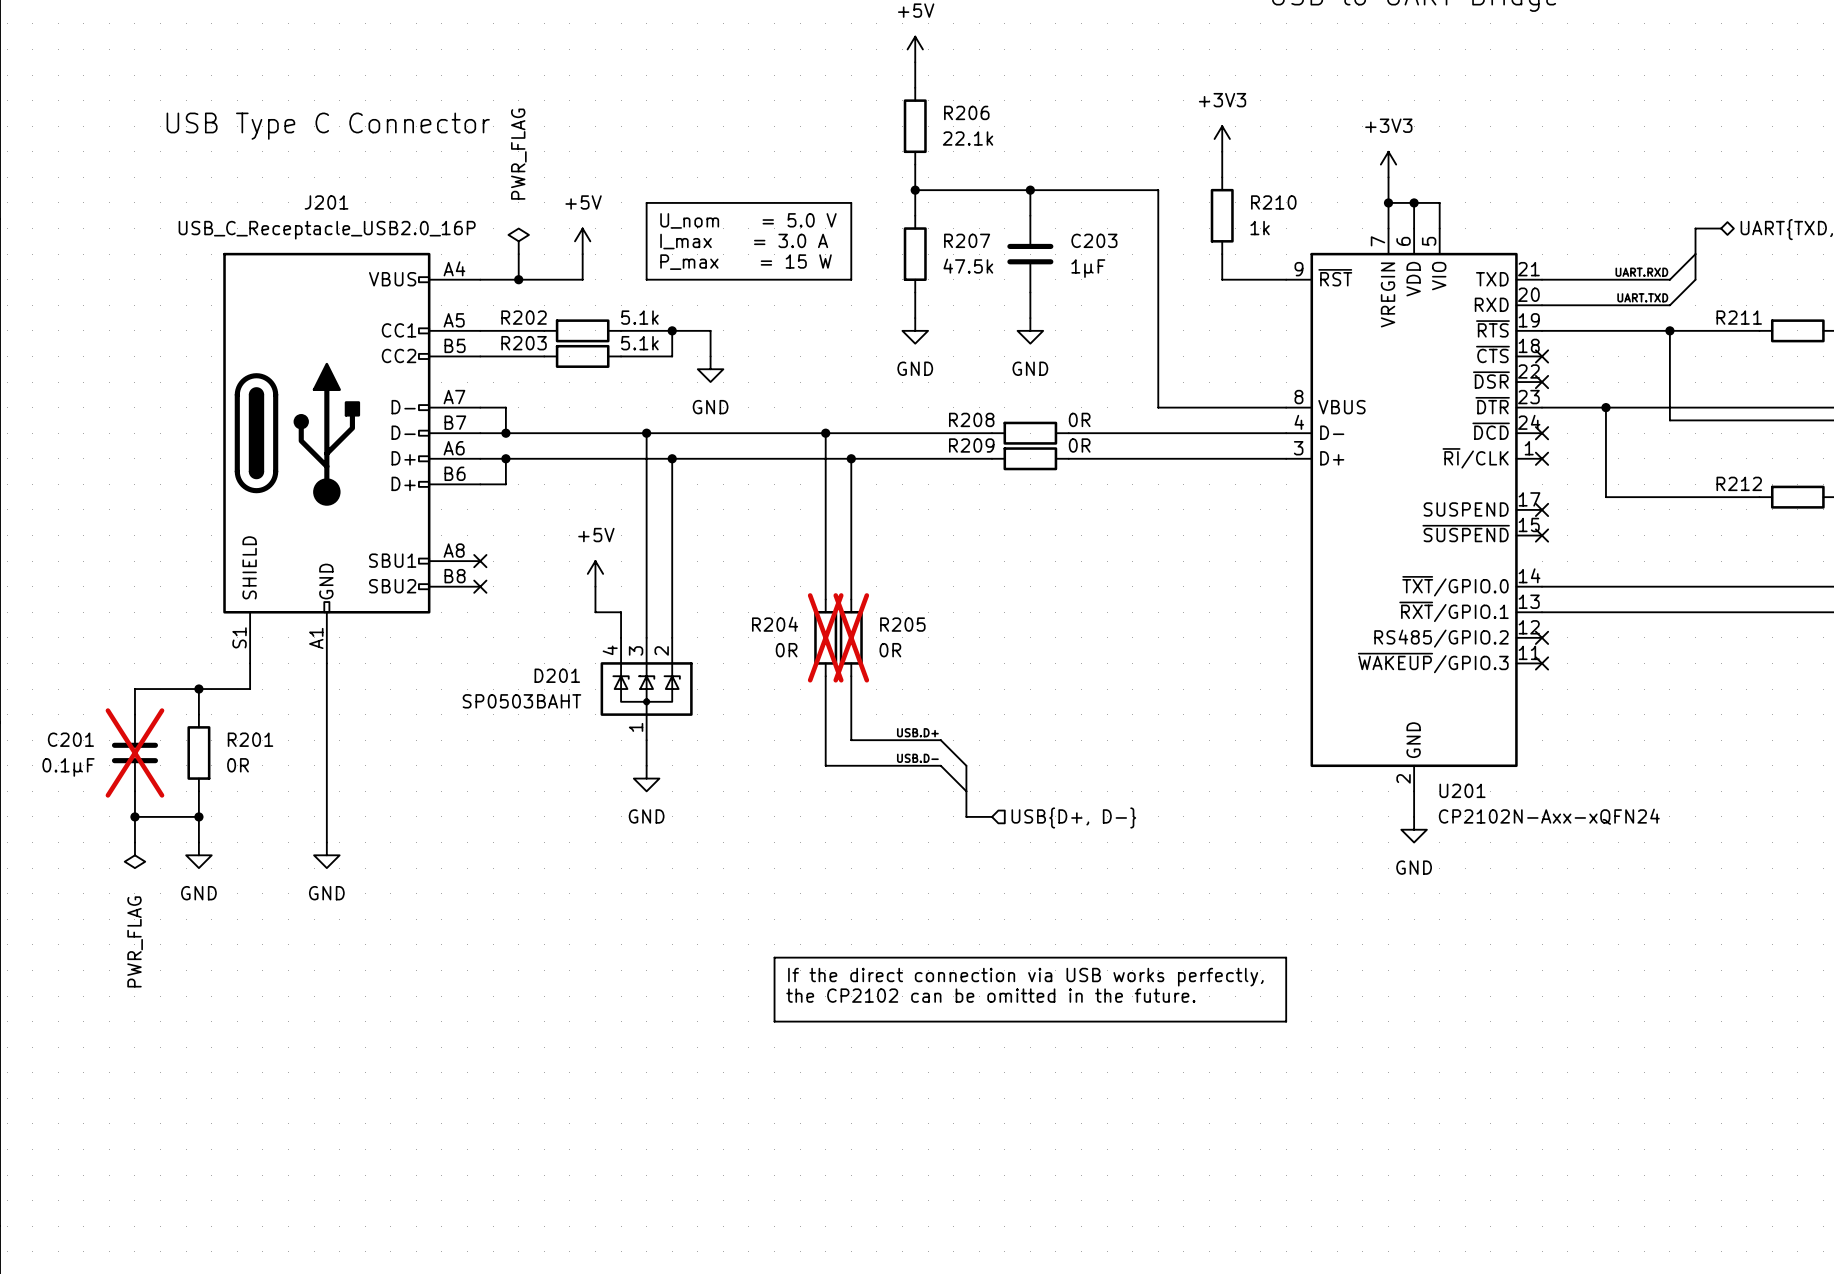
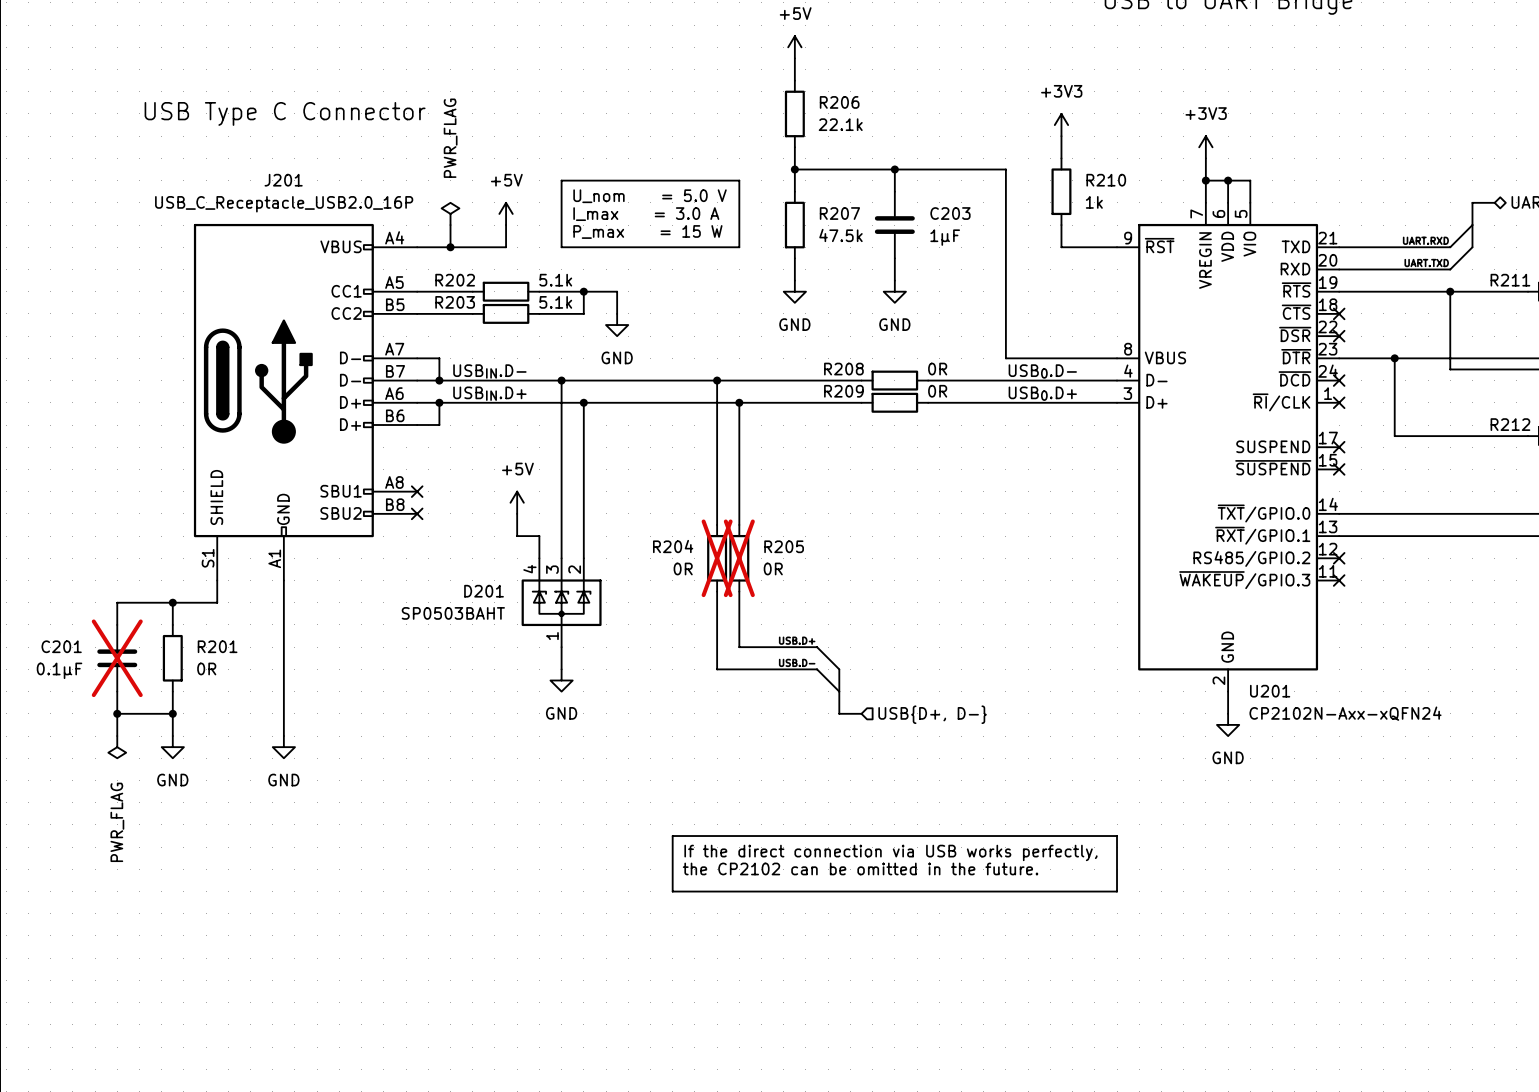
label: none -> USBIN.D- (489, 371)
label: none -> USB0.D- (1042, 371)
label: none -> USBIN.D+ (489, 393)
label: none -> USB0.D+ (1042, 393)

